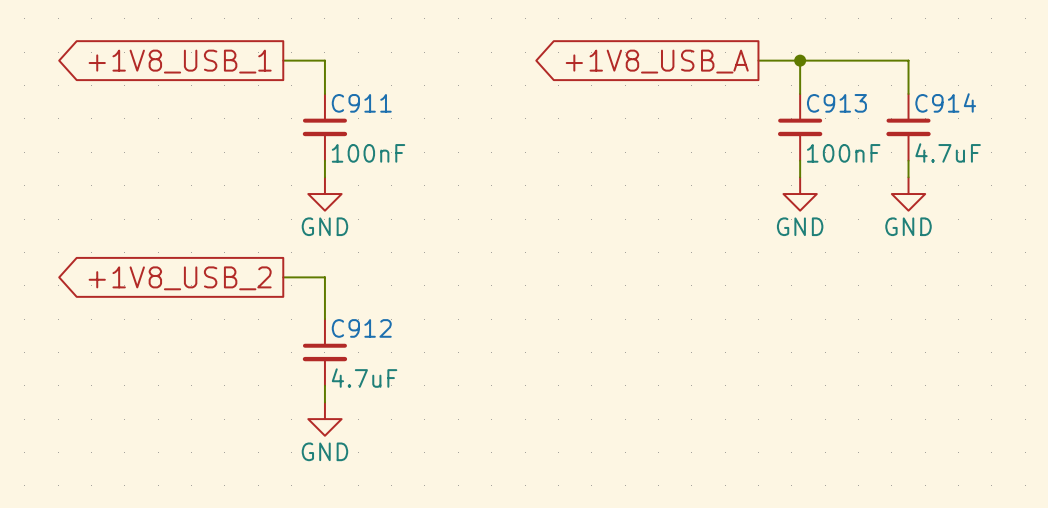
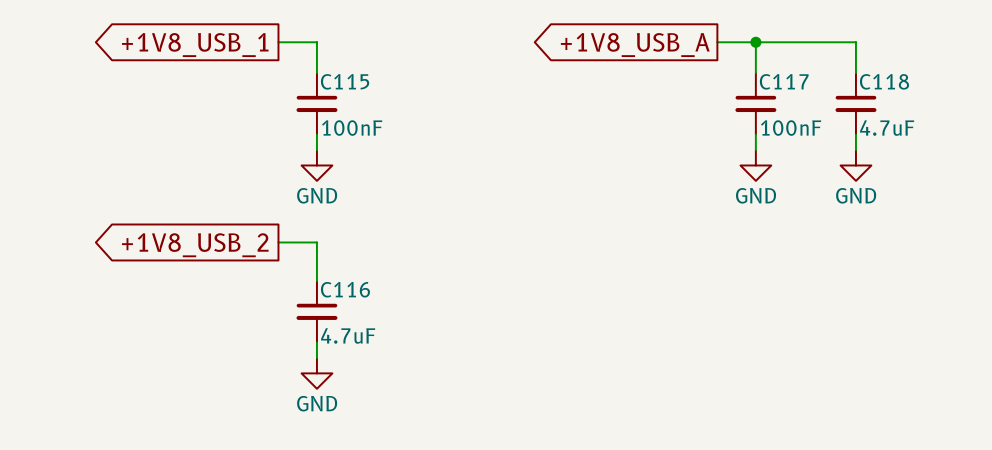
C914 name: C914 (945, 102) -> C118 (884, 81)
C911 name: C911 (361, 103) -> C115 (345, 81)
C913 name: C913 (836, 103) -> C117 (784, 81)
C912 name: C912 (361, 328) -> C116 (345, 289)

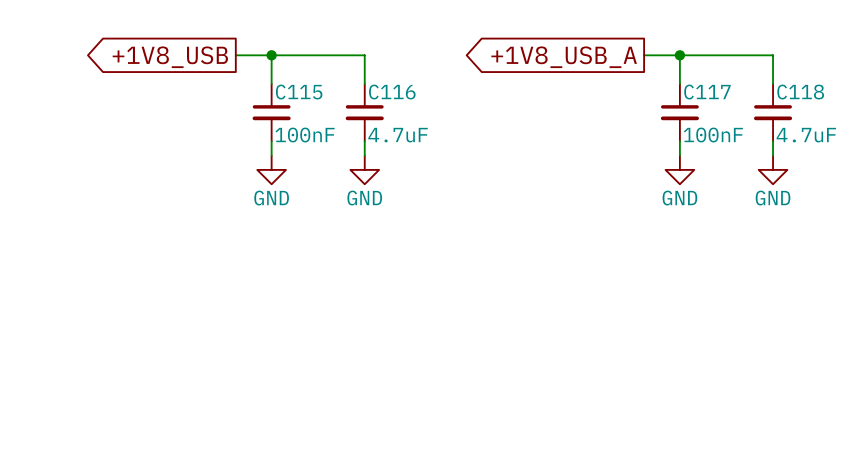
wire: none -> (271, 55) (364, 55) (364, 83)
junction: none -> (271, 55)
global label: +1V8_USB_1 (195, 45) -> +1V8_USB (170, 57)
wire: (278, 242) (316, 242) (316, 280) -> none
global label: +1V8_USB_2 (195, 245) -> none
C116 position: (316, 311) -> (364, 112)
wire: (316, 342) (316, 357) -> (364, 141) (364, 155)
power symbol position: GND (316, 373) -> GND (364, 169)

